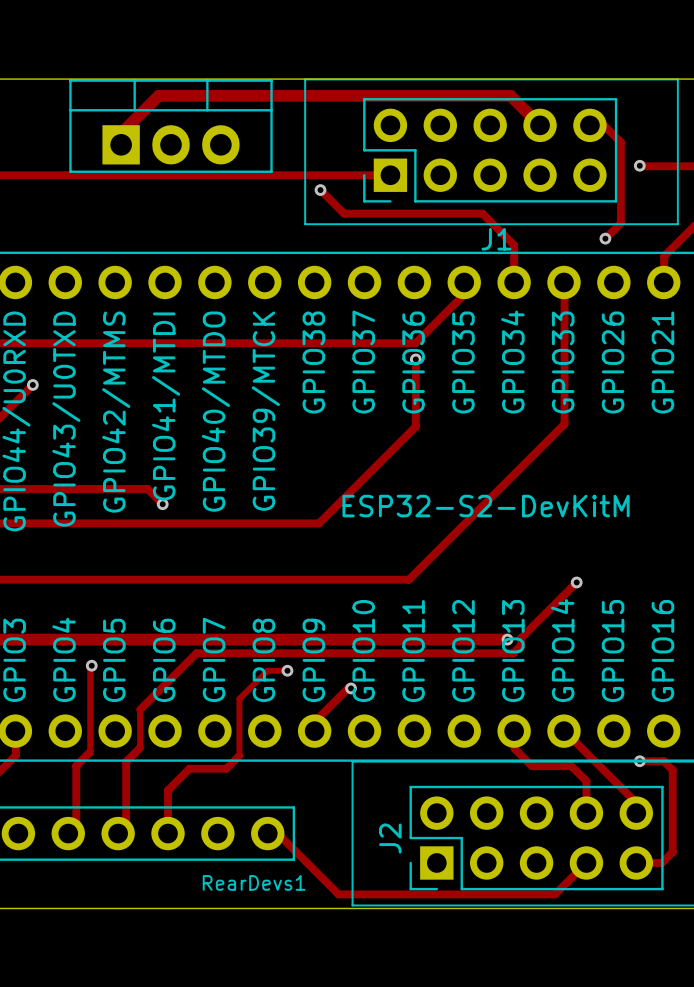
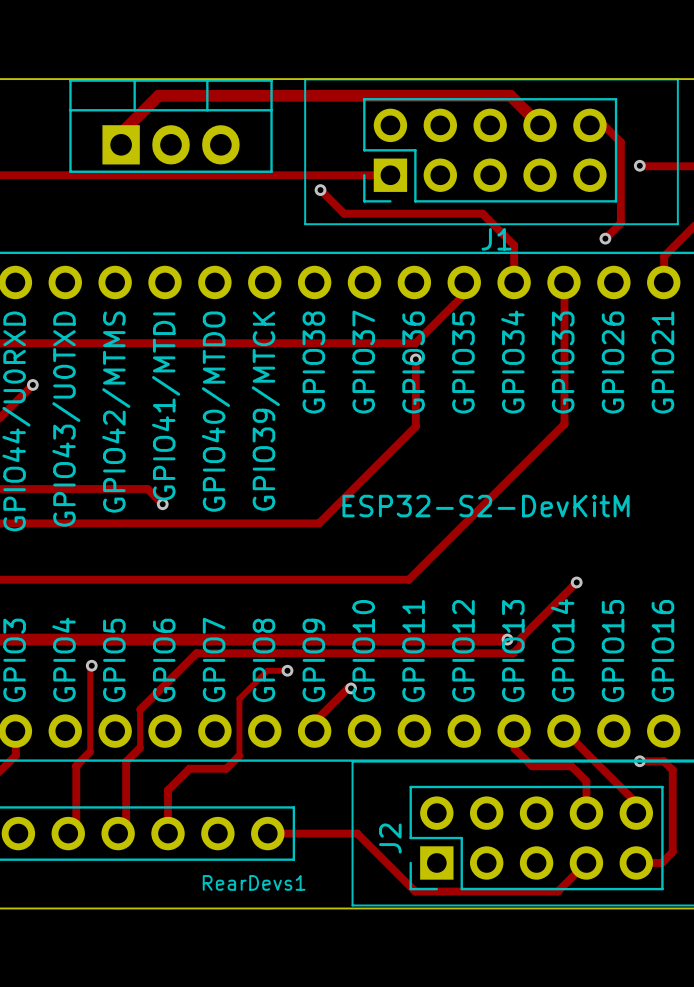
track: (277, 833) (338, 894) (555, 894) (557, 891) -> (277, 833) (357, 833) (415, 891) (557, 891)

